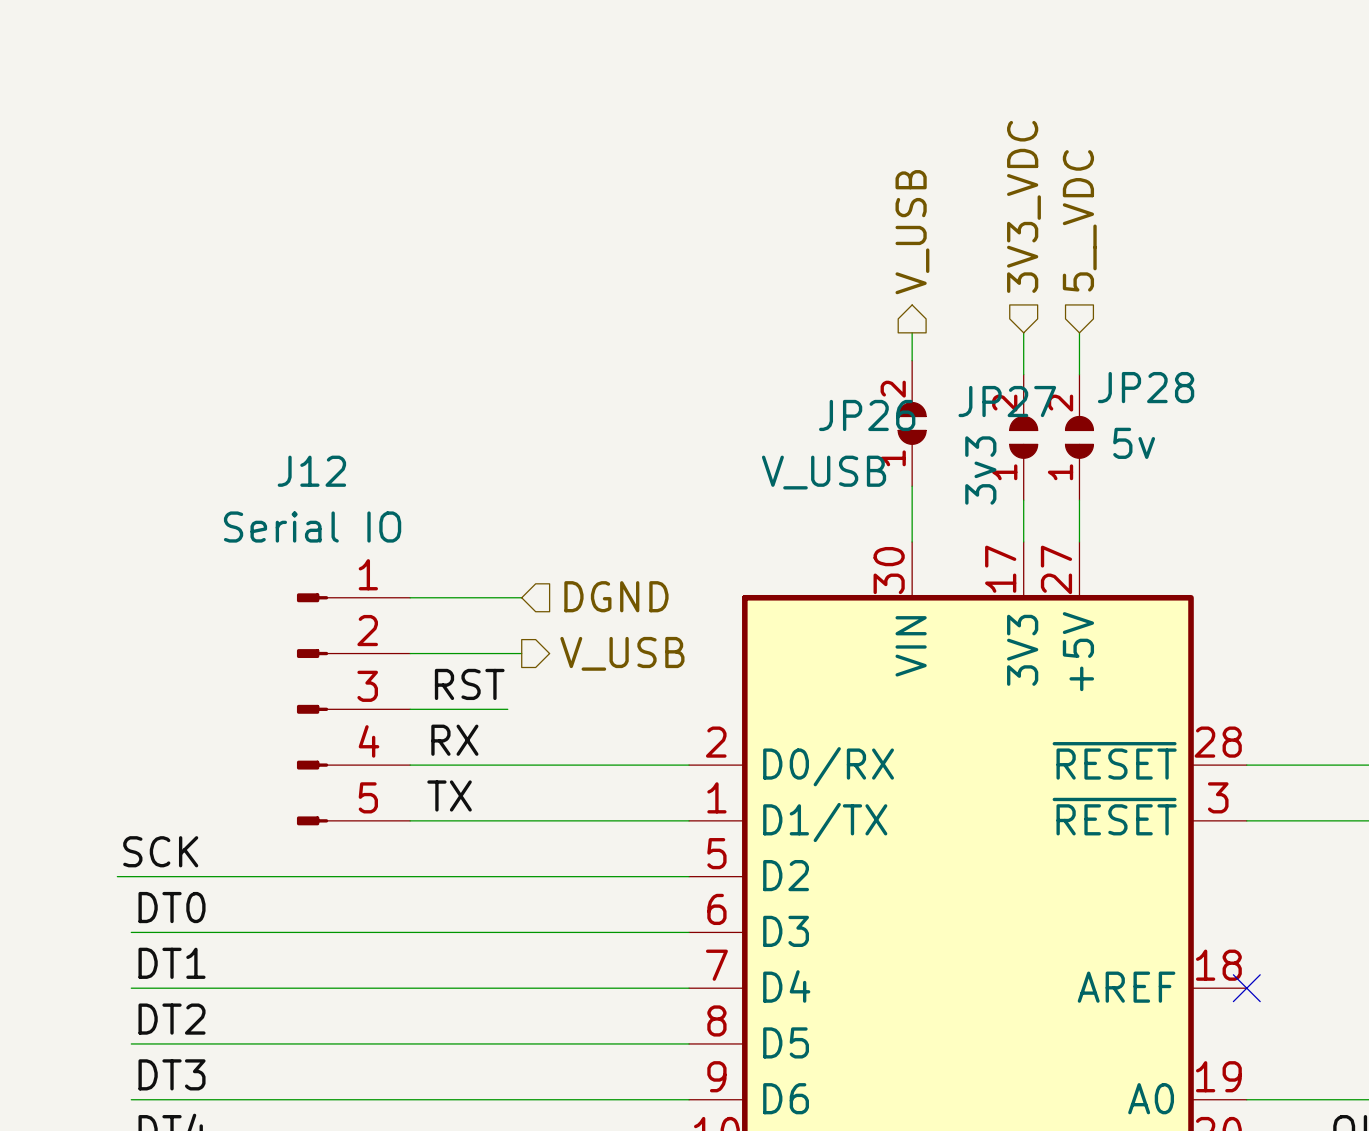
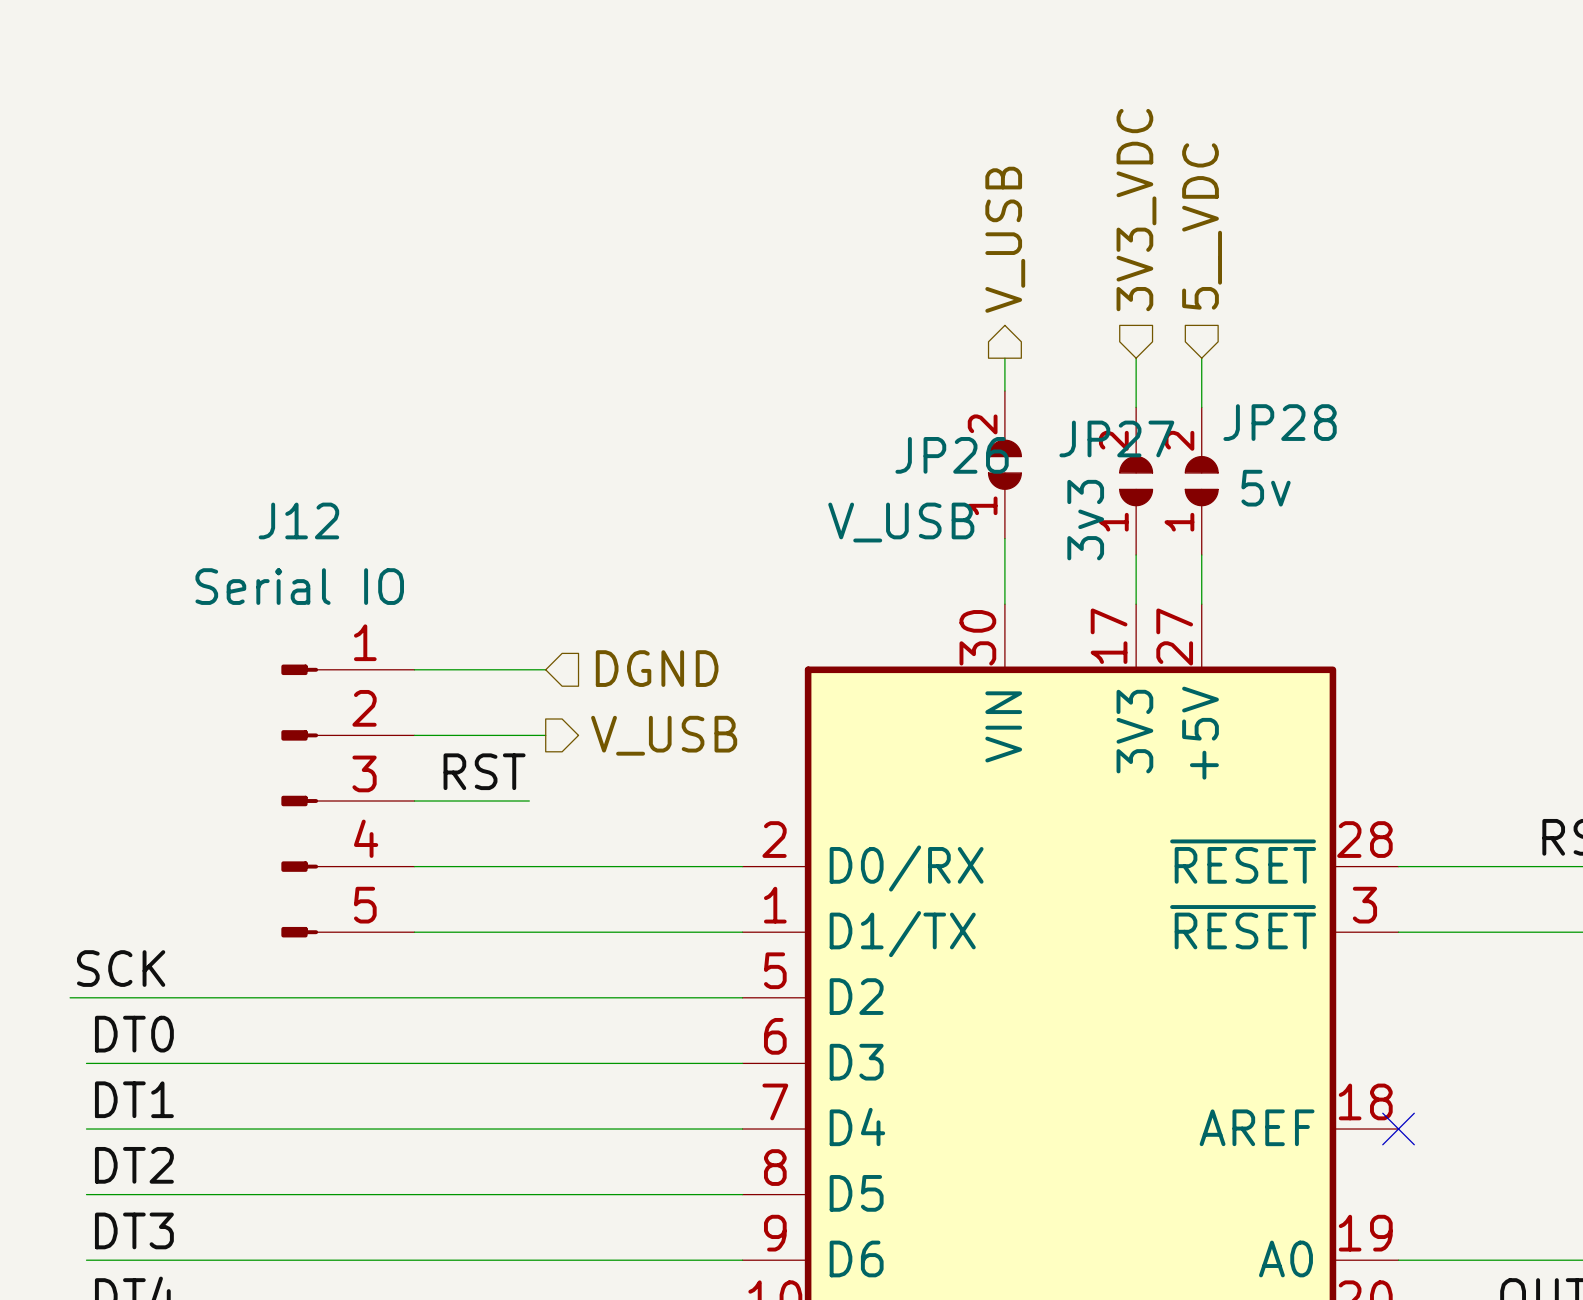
label: RX (454, 740) -> none
label: TX (449, 795) -> none

